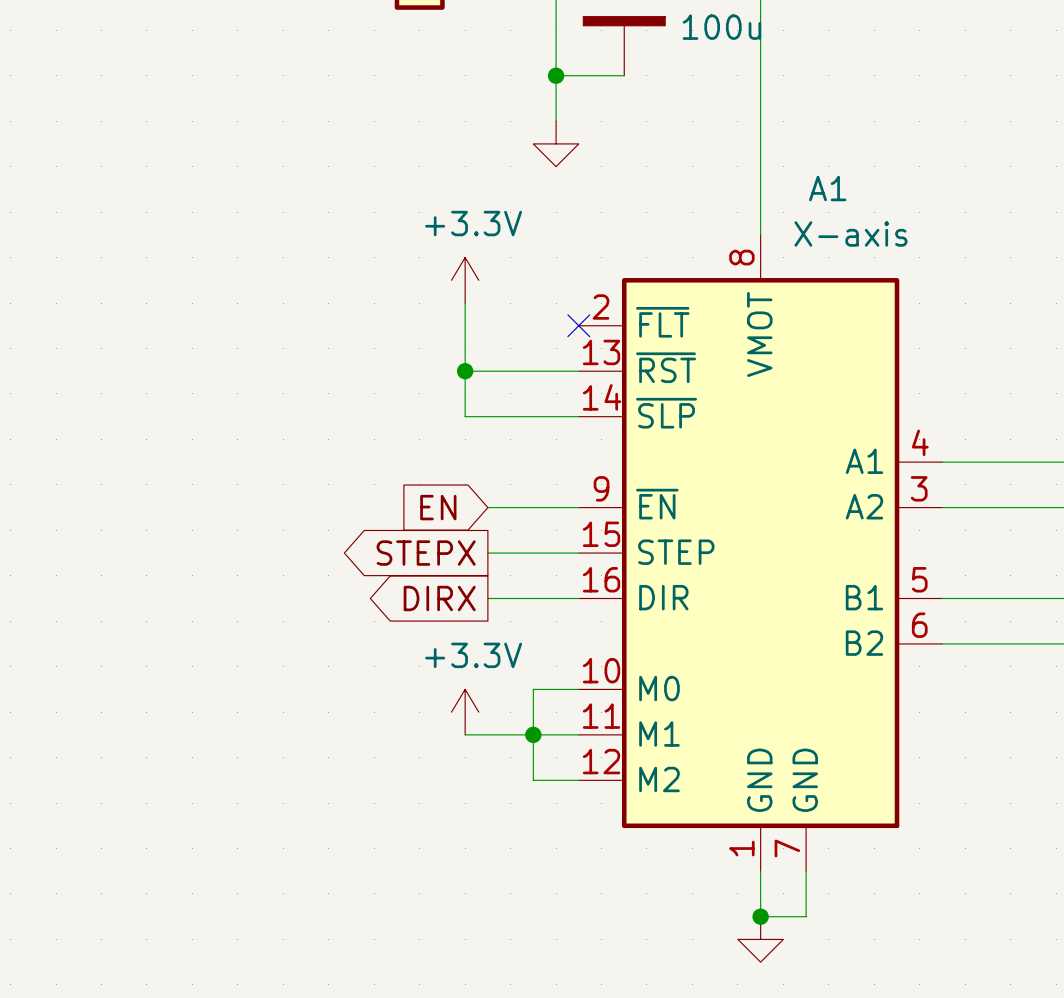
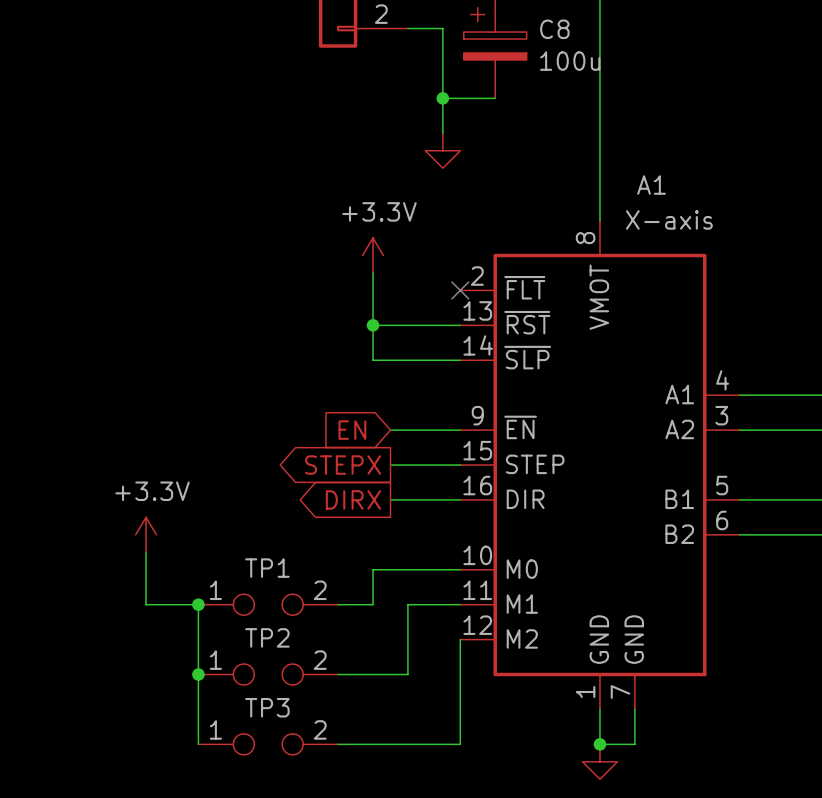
wire: none -> (146, 552) (146, 604) (198, 604) (198, 744)
wire: (533, 689) (533, 780) (578, 780) -> (425, 569) (373, 569) (373, 604) (338, 604)
power symbol position: +3.3V (465, 712) -> +3.3V (146, 534)
junction: none -> (198, 604)
TP1: none -> (268, 604)
wire: (465, 734) (510, 734) -> (338, 674) (407, 674) (407, 604)
junction: (533, 734) -> none
wire: none -> (460, 639) (460, 744) (338, 744)
junction: none -> (198, 674)
TP2: none -> (268, 674)
TP3: none -> (268, 744)

